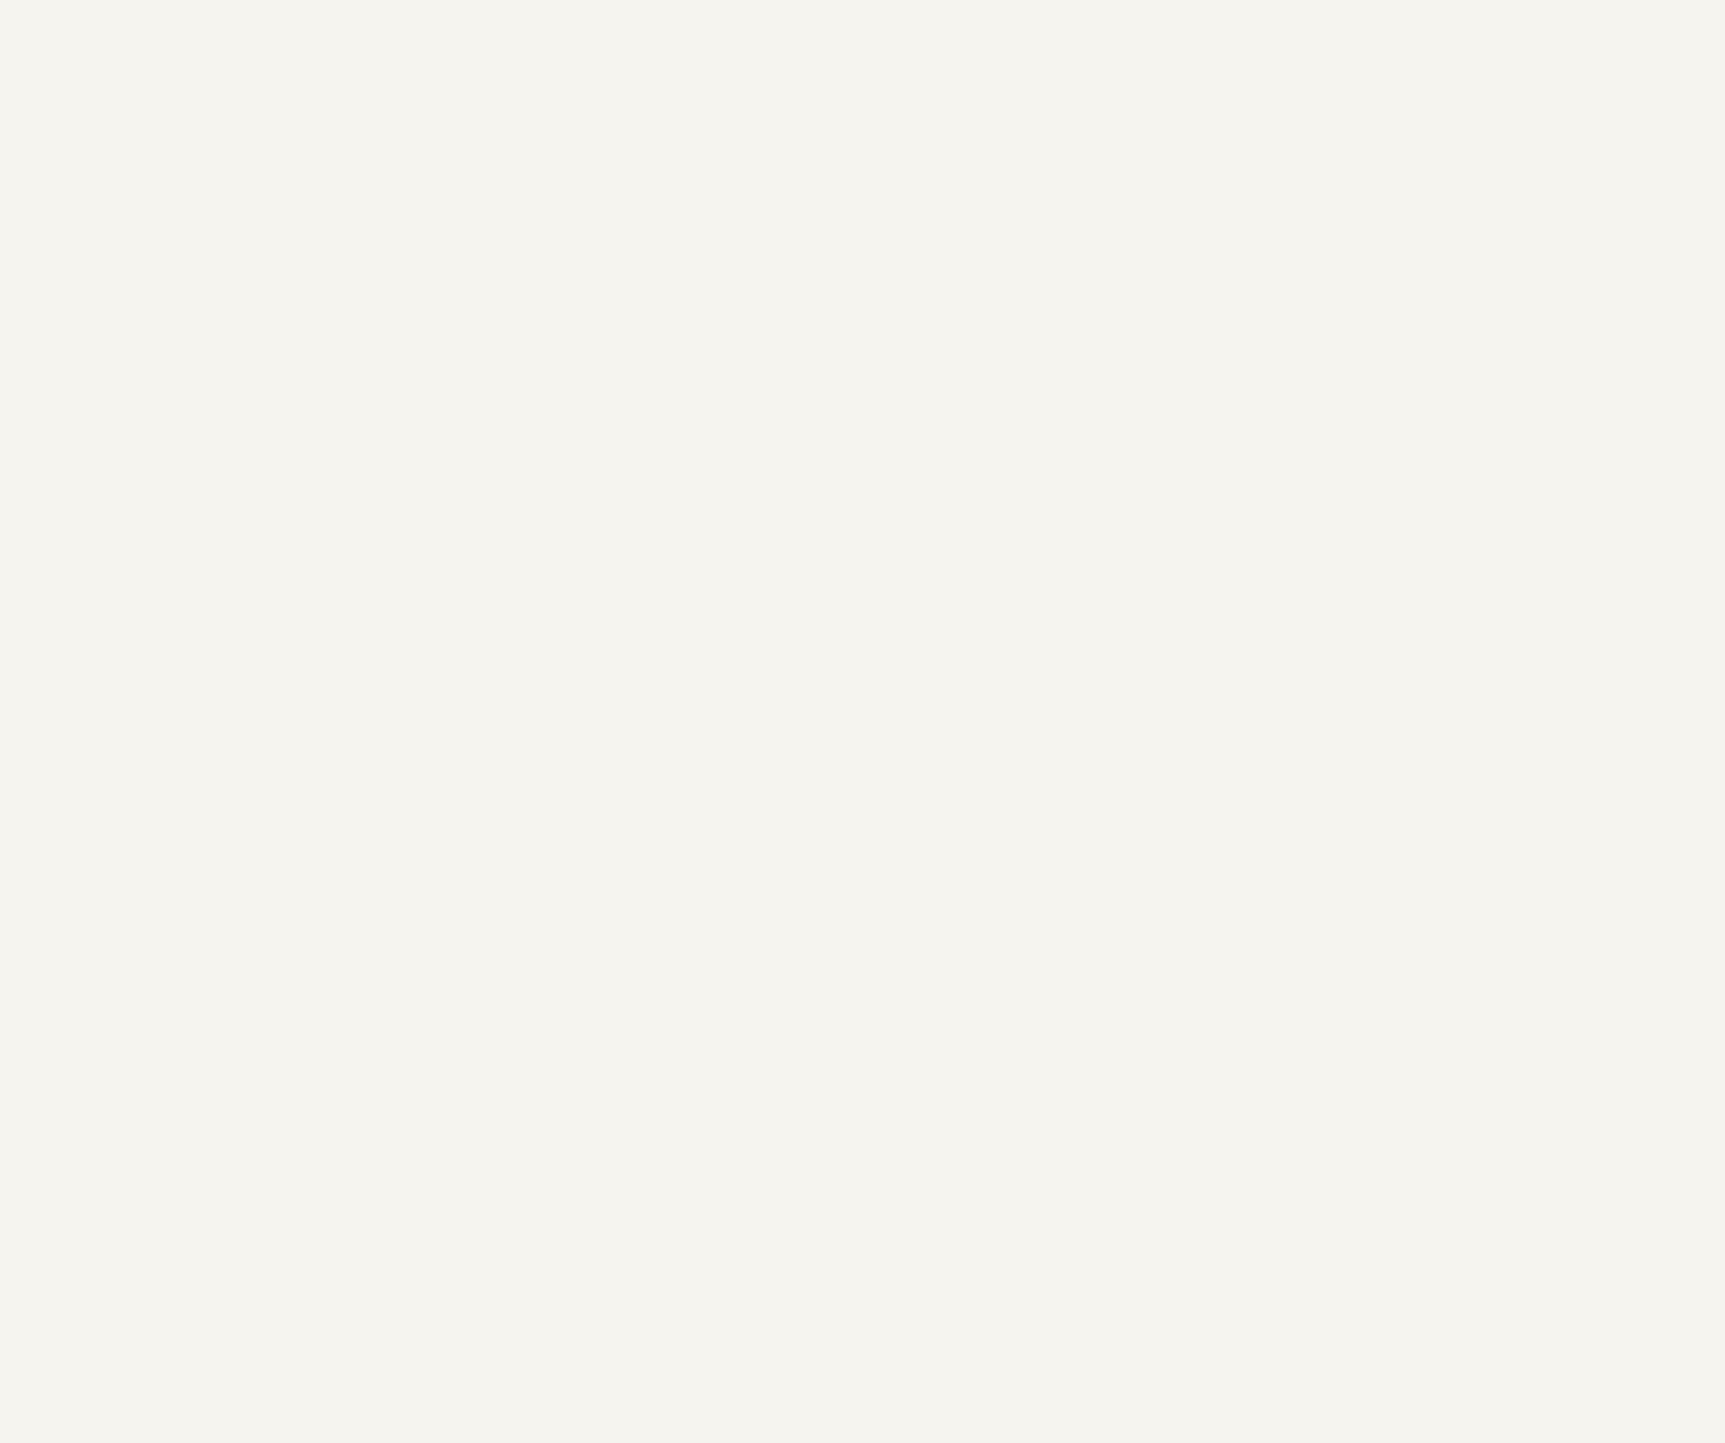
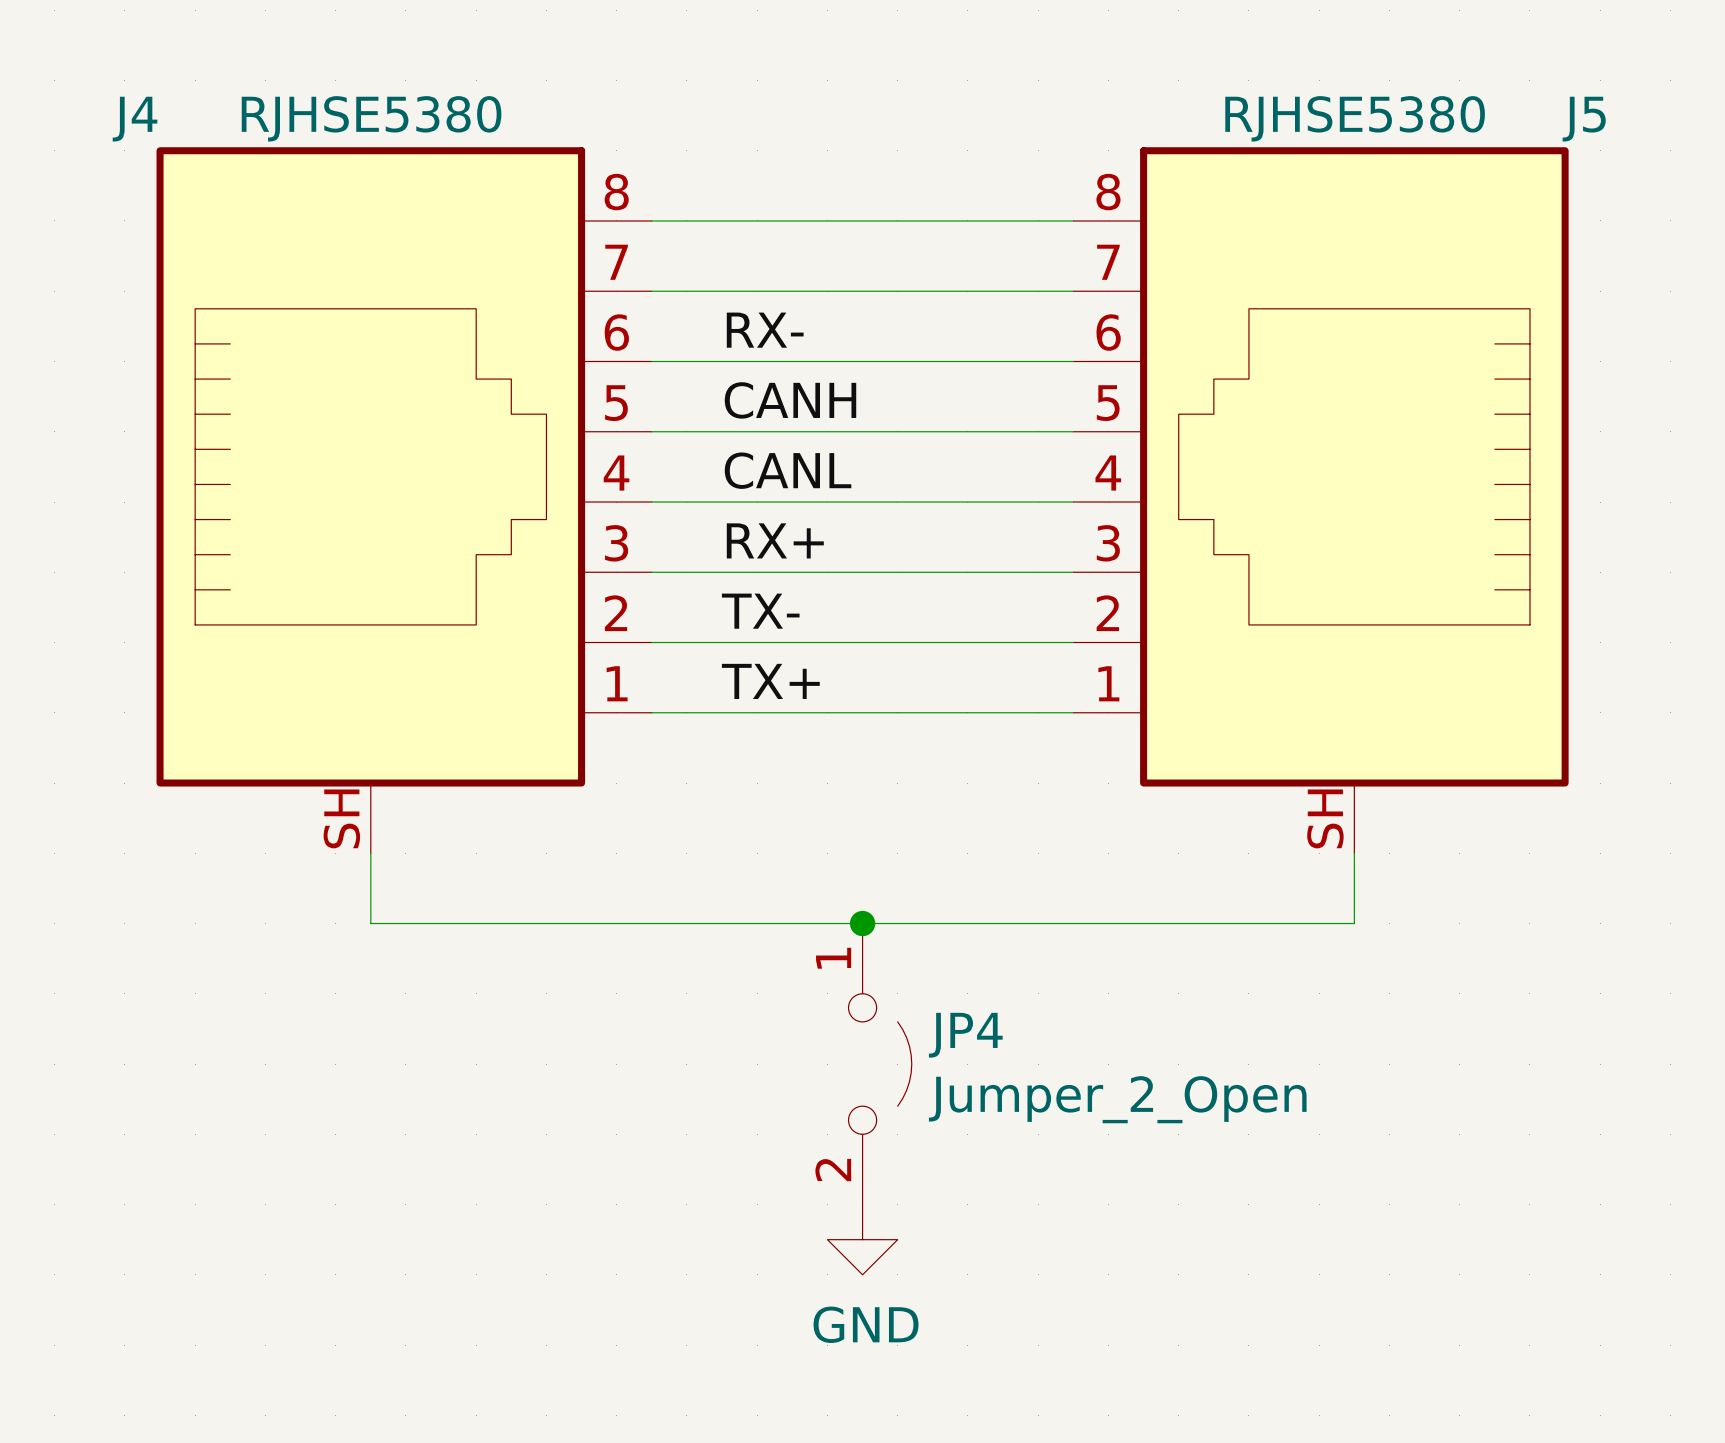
wire: none -> (651, 220) (1073, 220)
wire: none -> (651, 291) (1073, 291)
label: none -> RX- (765, 330)
wire: none -> (651, 361) (1073, 361)
label: none -> CANH (790, 400)
wire: none -> (651, 431) (1073, 431)
label: none -> CANL (788, 470)
J4: none -> RJHSE5380 (404, 500)
J5: none -> RJHSE5380 (1320, 500)
wire: none -> (651, 502) (1073, 502)
label: none -> RX+ (775, 540)
wire: none -> (651, 572) (1073, 572)
label: none -> TX- (760, 611)
wire: none -> (651, 642) (1073, 642)
label: none -> TX+ (770, 681)
wire: none -> (651, 712) (1073, 712)
wire: none -> (370, 853) (370, 923) (1354, 923) (1354, 853)
junction: none -> (862, 923)
JP4: none -> Jumper_2_Open (880, 1064)
power symbol: none -> GND (862, 1239)

